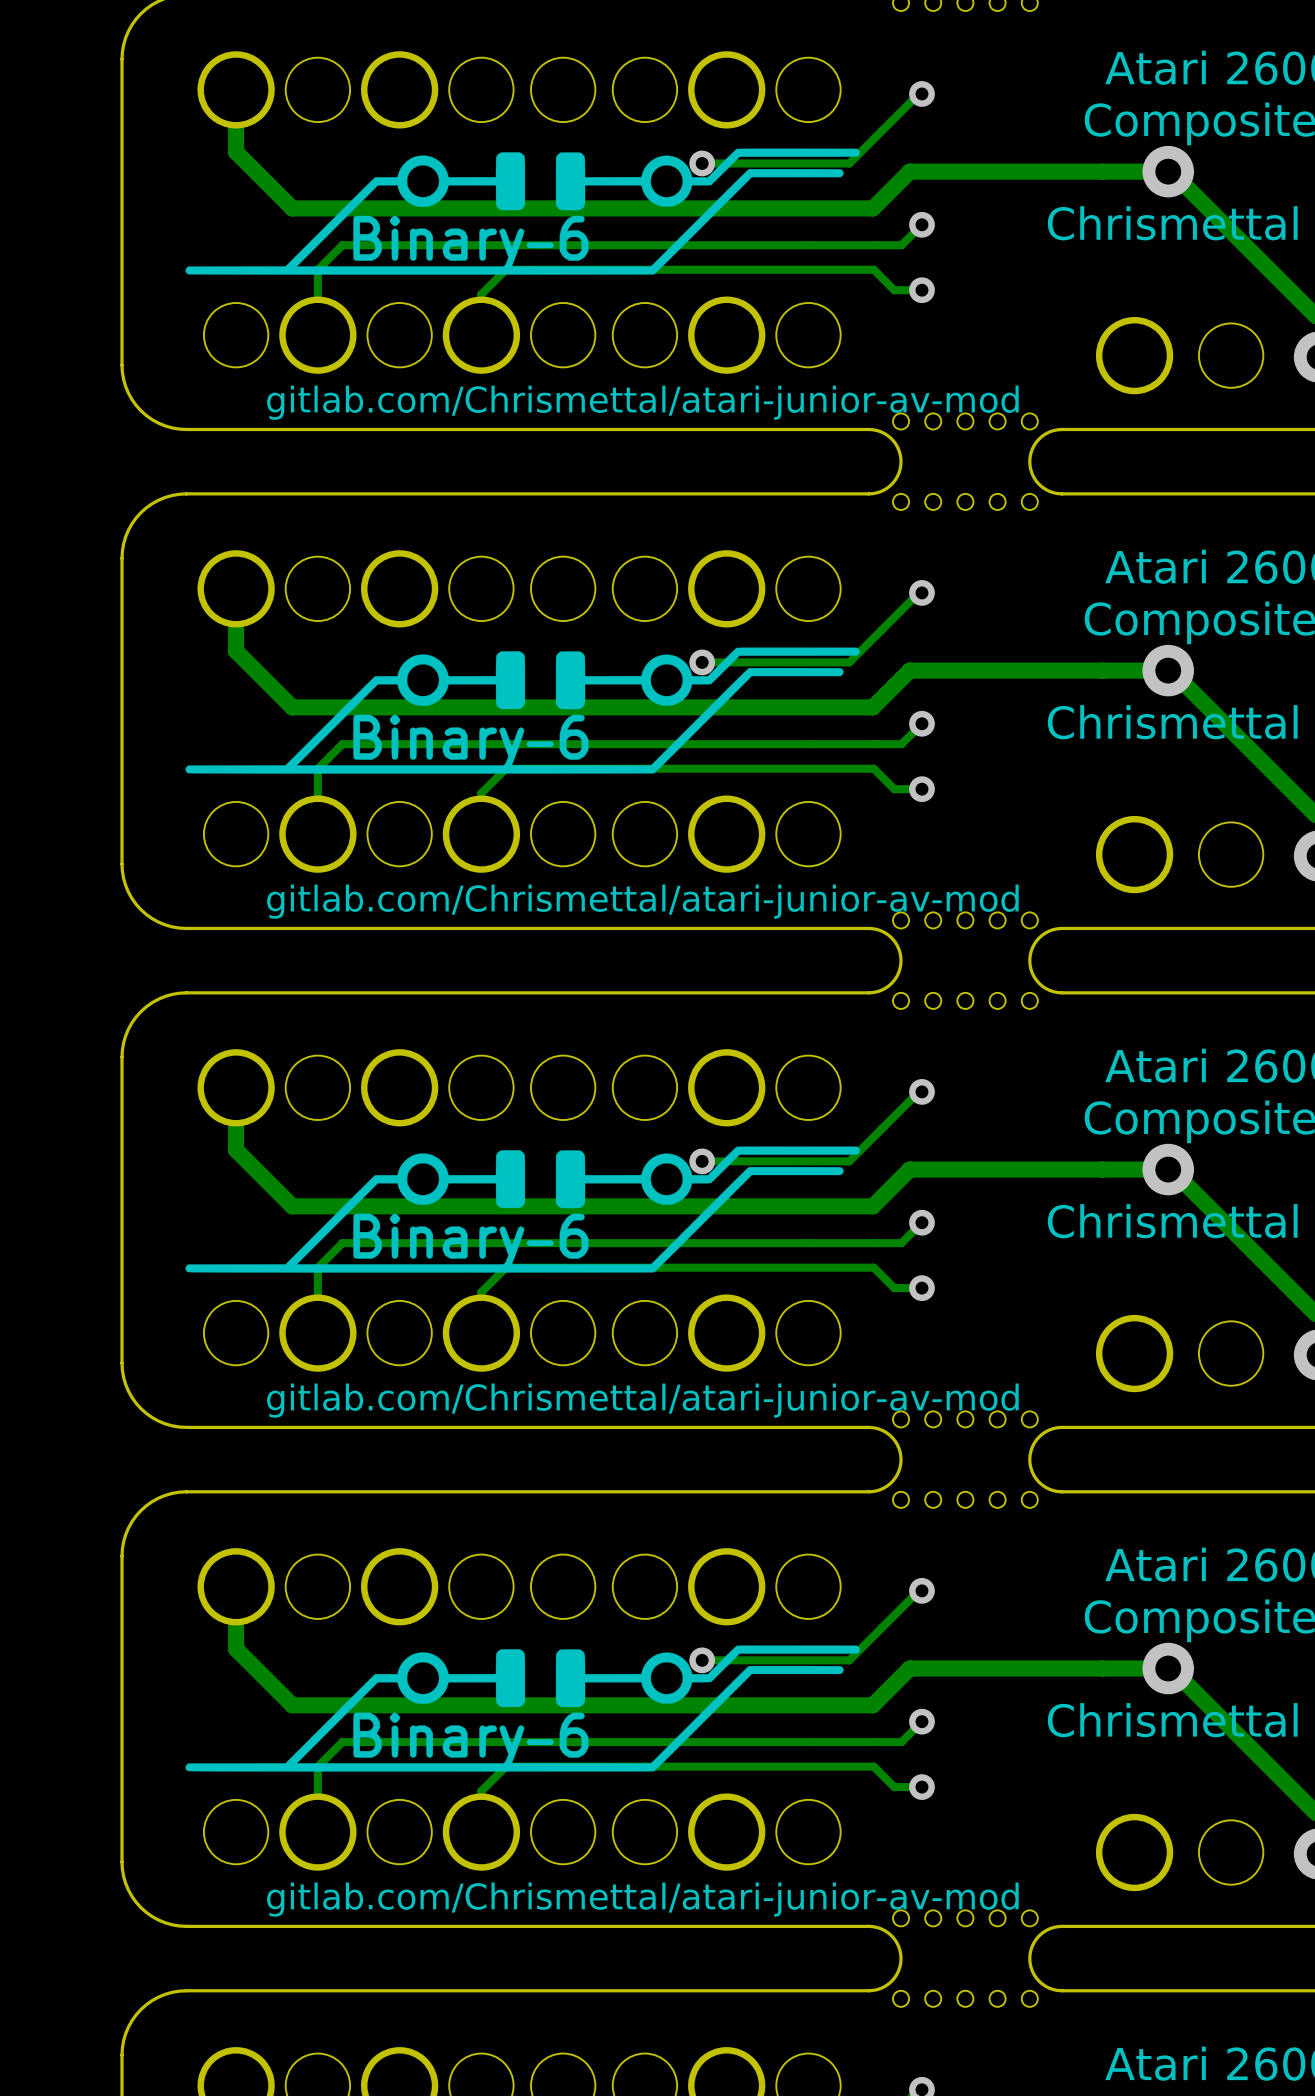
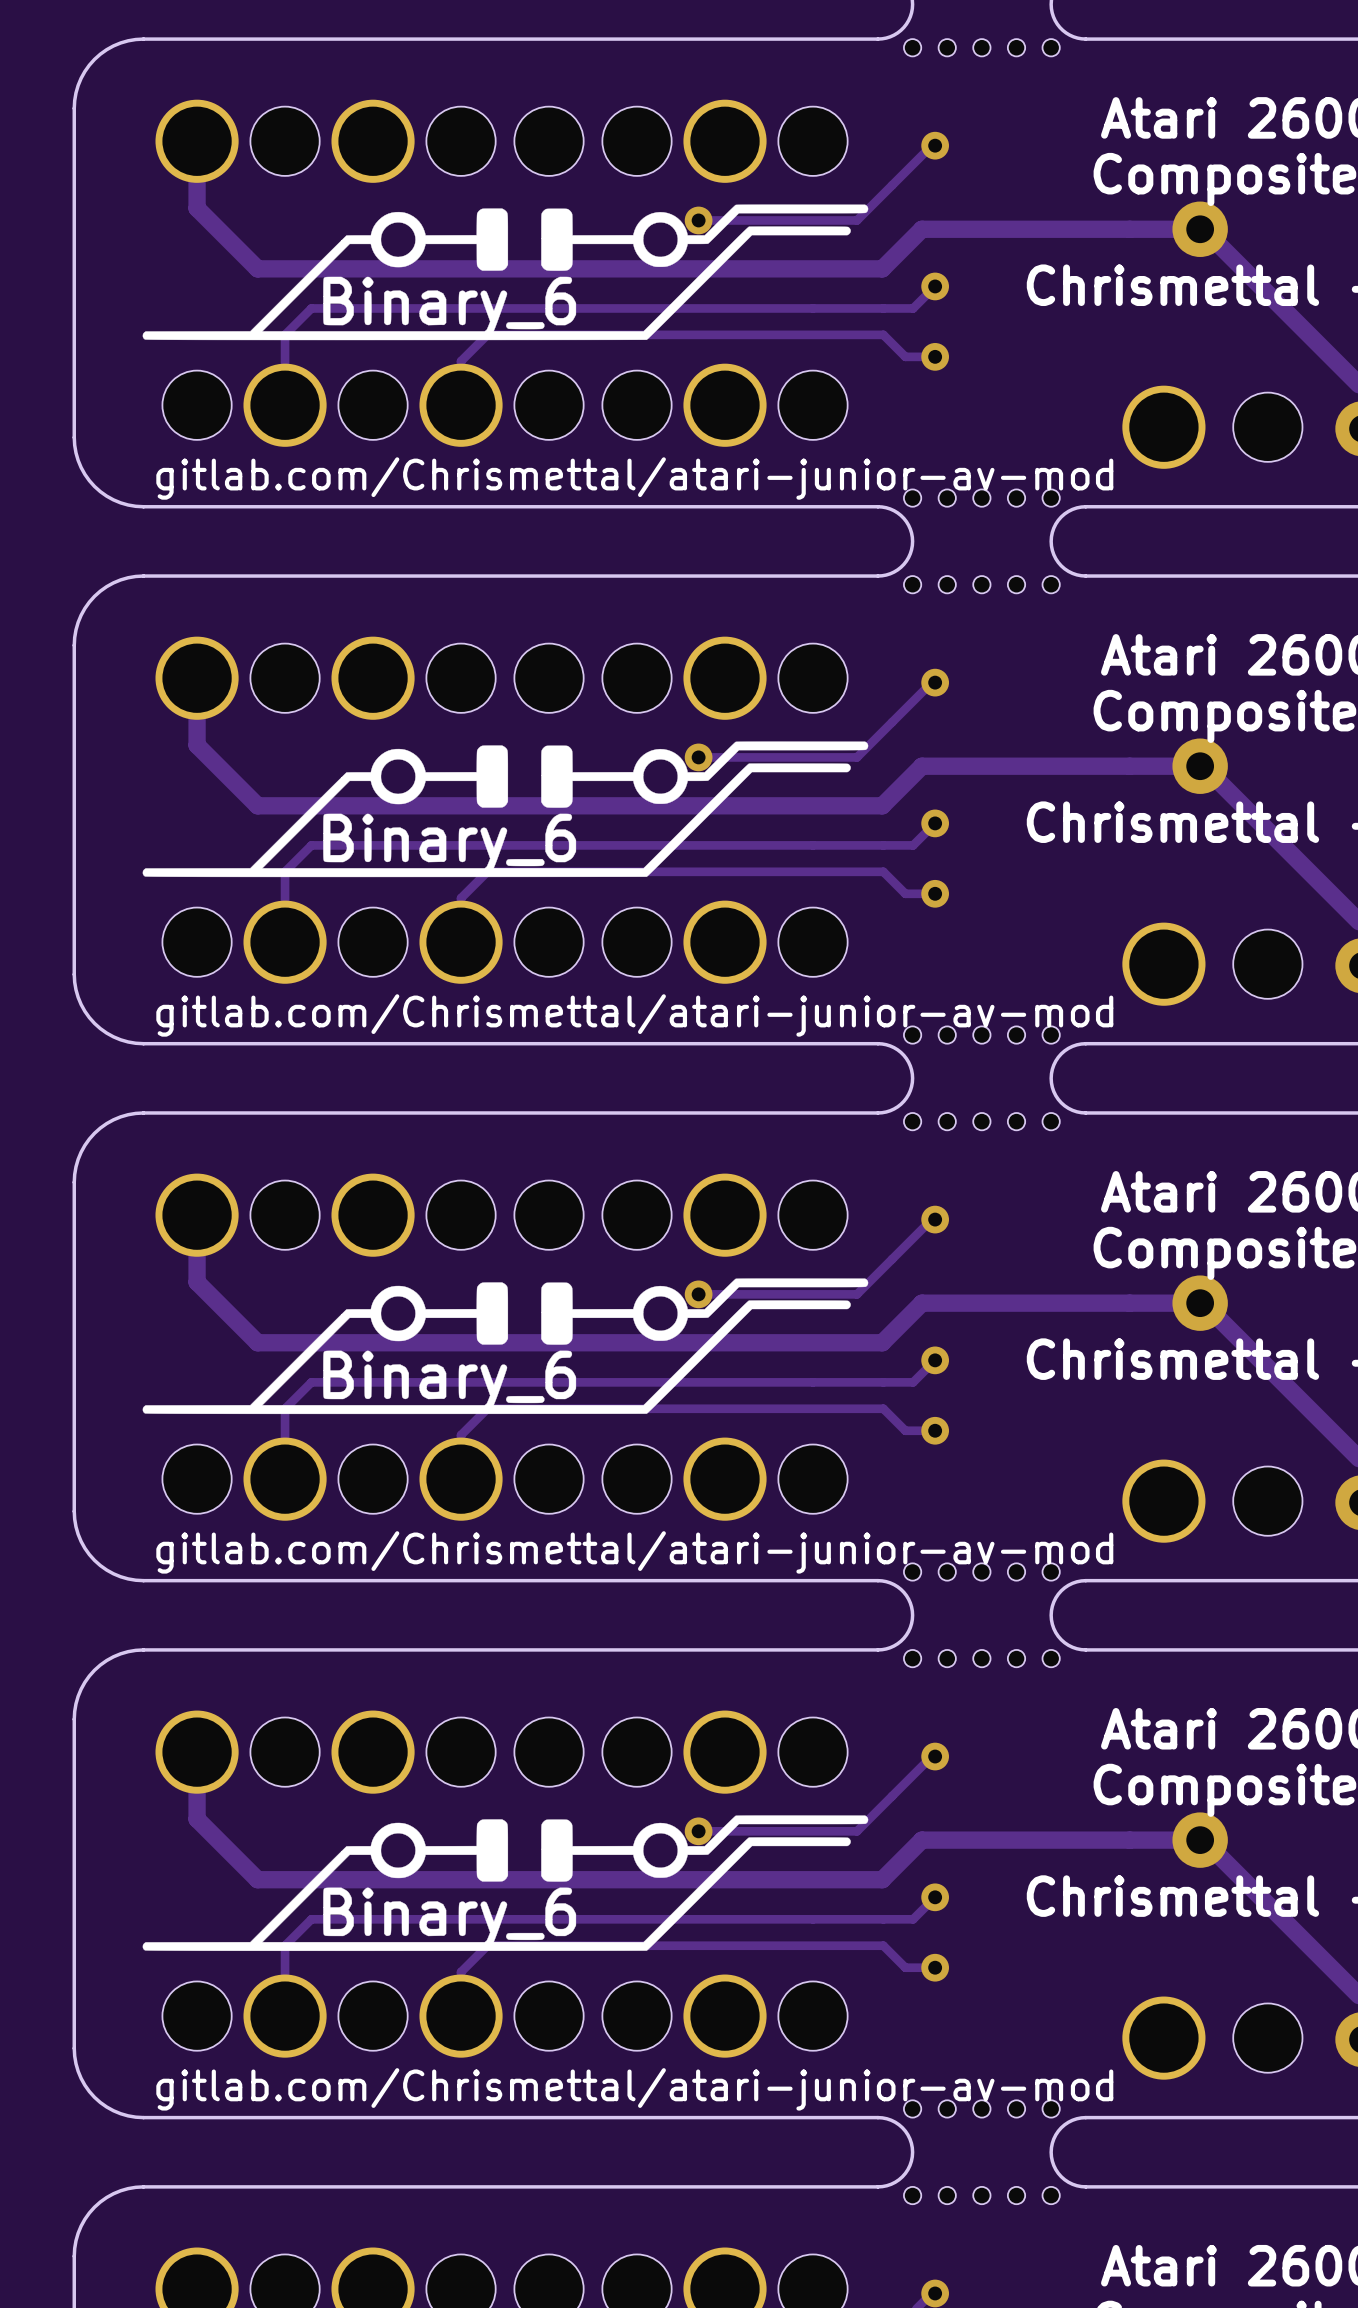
drawing shape: [185, 148, 860, 275] -> [142, 204, 869, 341]
drawing shape: [185, 647, 860, 774] -> [142, 741, 869, 878]
drawing shape: [185, 1146, 860, 1273] -> [142, 1278, 869, 1415]
drawing shape: [185, 1645, 860, 1772] -> [142, 1815, 869, 1952]

